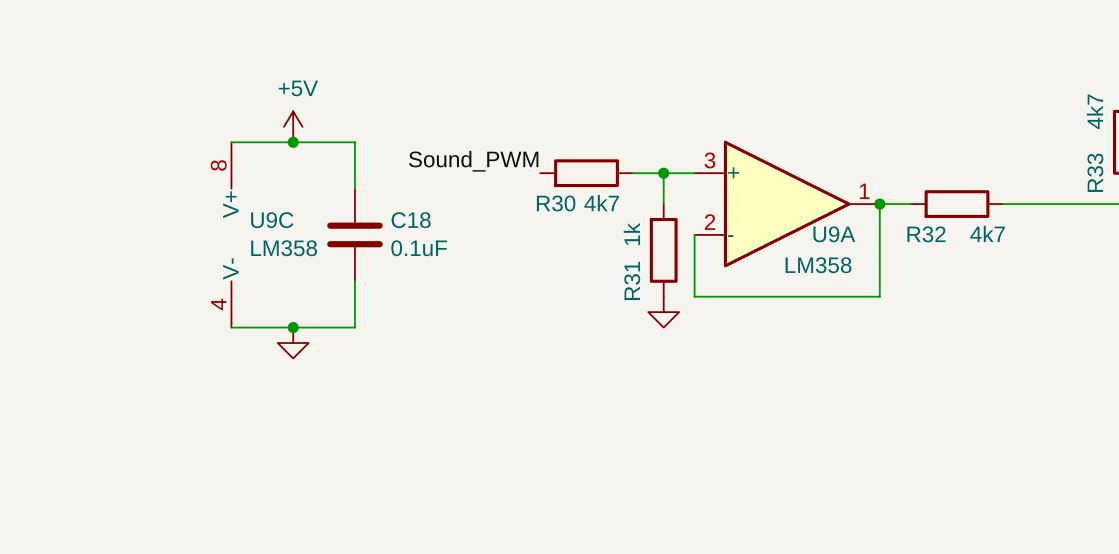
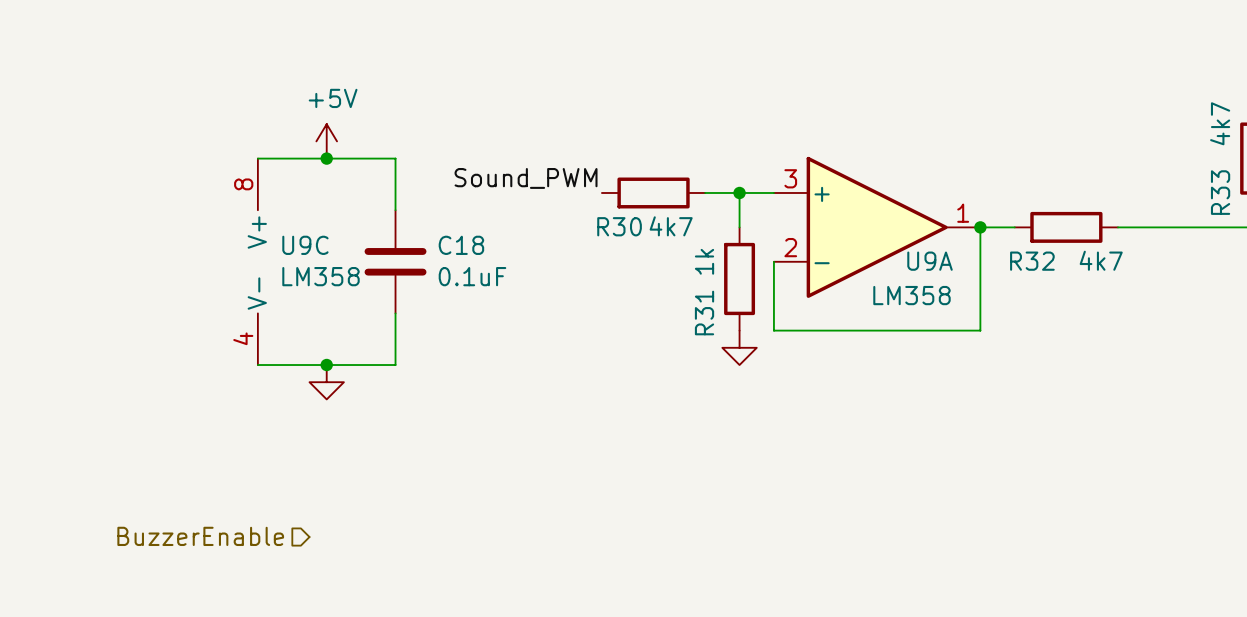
hierarchical label: none -> BuzzerEnable (200, 536)

